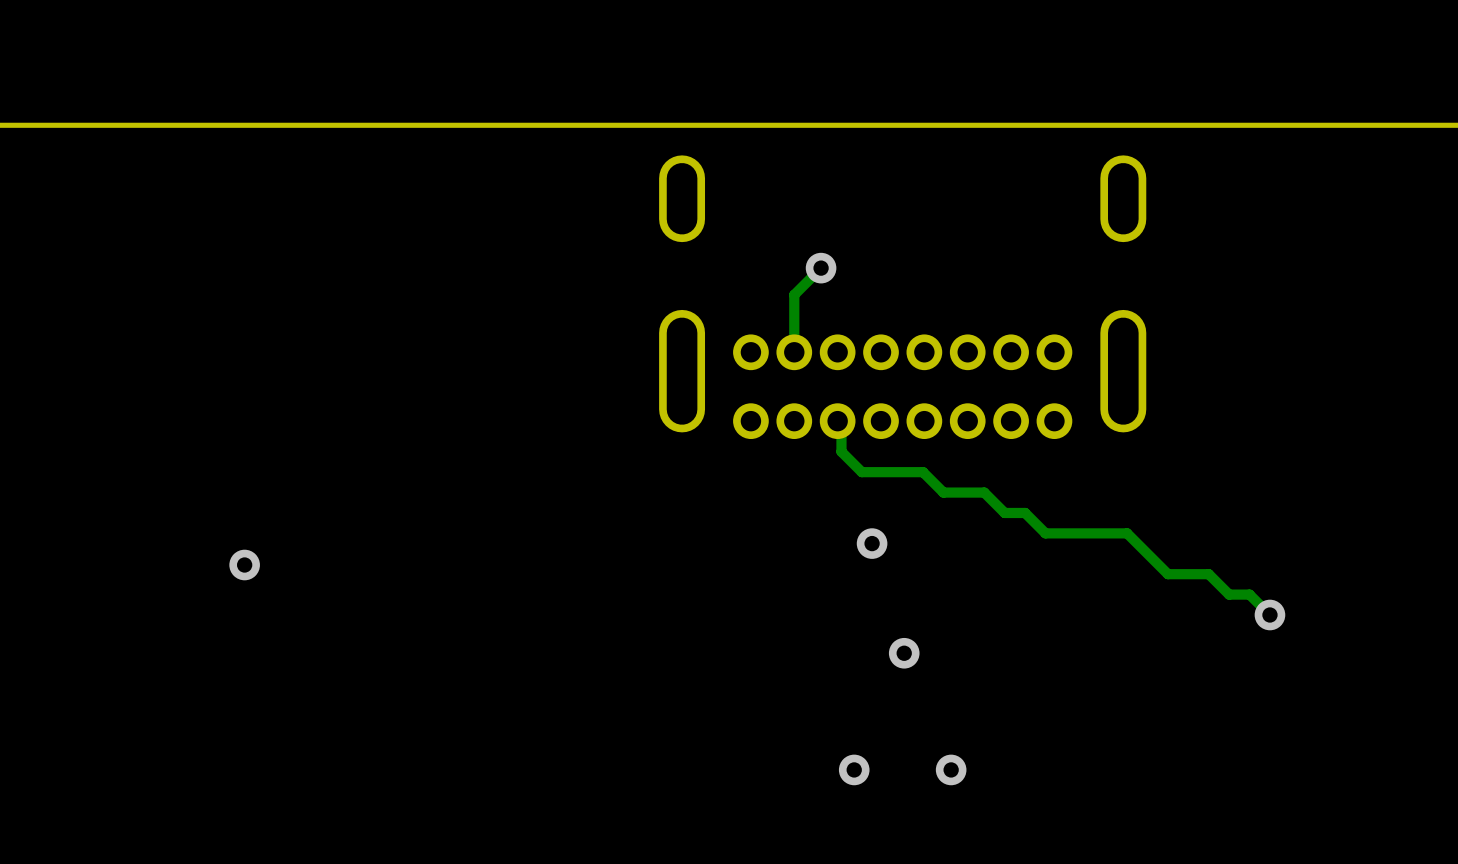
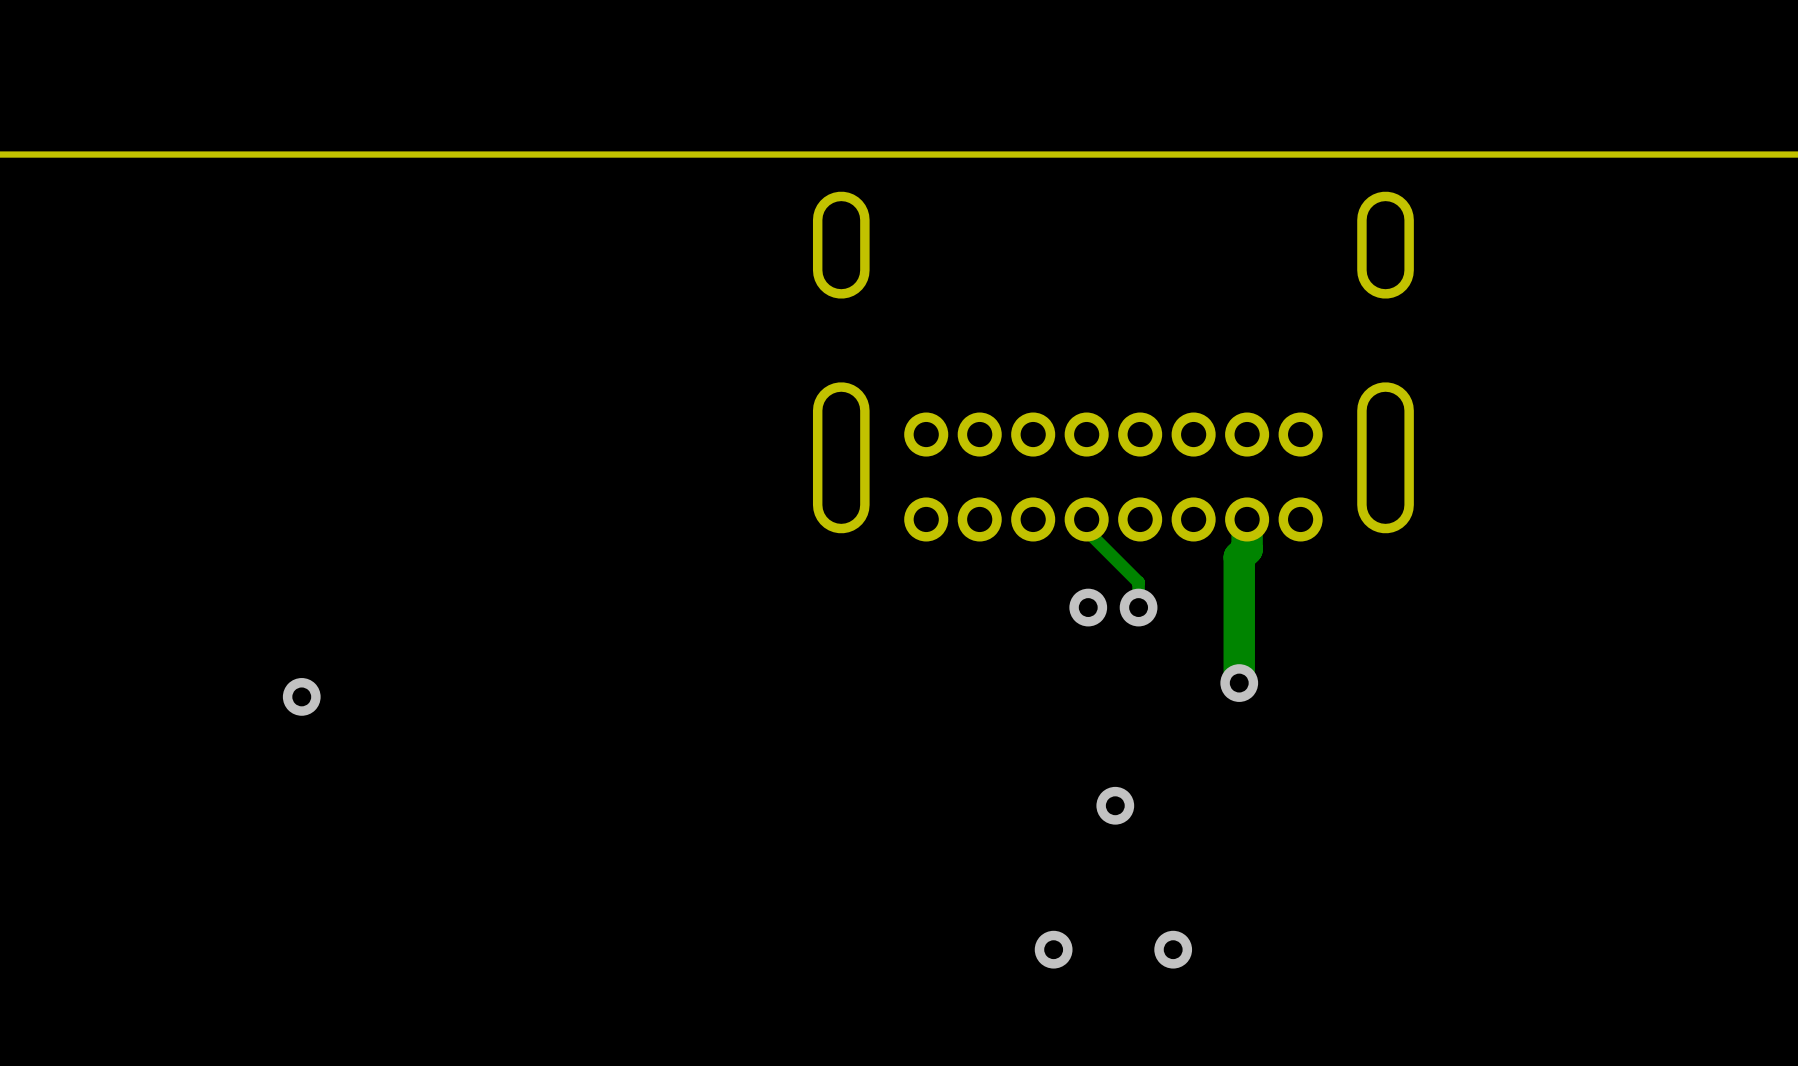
track: (821, 268) (794, 294) (794, 352) -> none
via: (821, 268) -> none
track: (837, 421) (841, 424) (841, 451) (861, 472) (923, 472) (943, 492) (984, 492) (1004, 512) (1025, 512) (1045, 533) (1127, 533) (1167, 574) (1208, 574) (1229, 594) (1249, 594) (1269, 615) -> none
track: none -> (1086, 519) (1088, 532) (1138, 582) (1138, 607)
track: none -> (1247, 519) (1247, 549) (1239, 557) (1239, 683)
via: none -> (1088, 607)
via: none -> (1138, 607)
via: (872, 543) -> none
via: none -> (1239, 683)
via: (1269, 615) -> none

